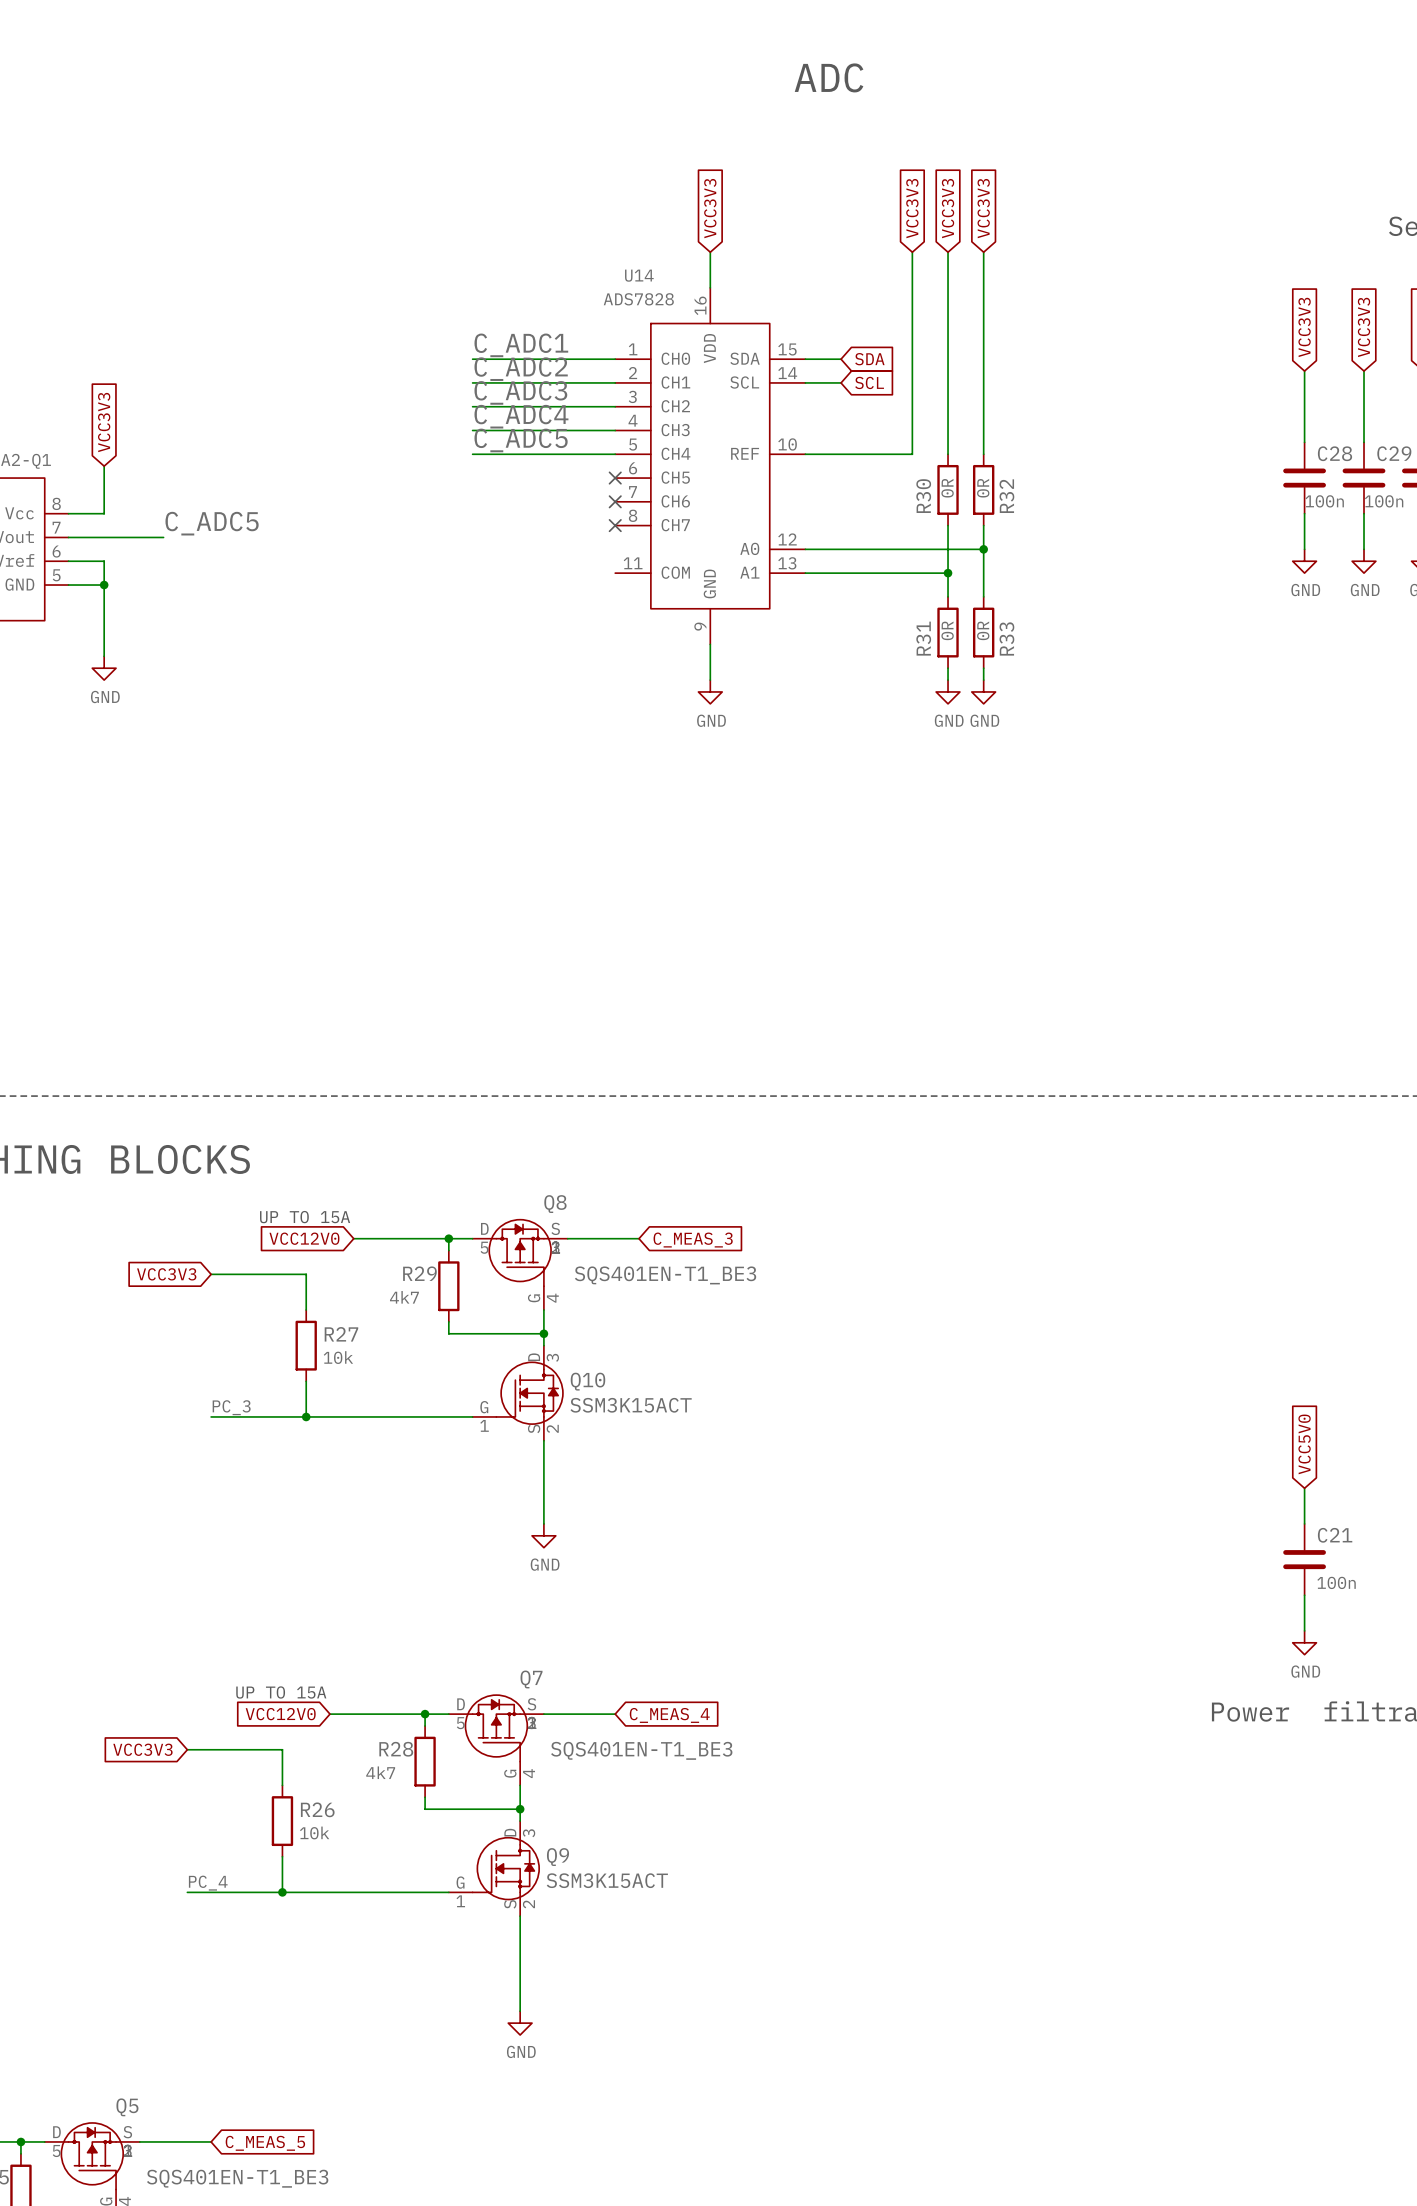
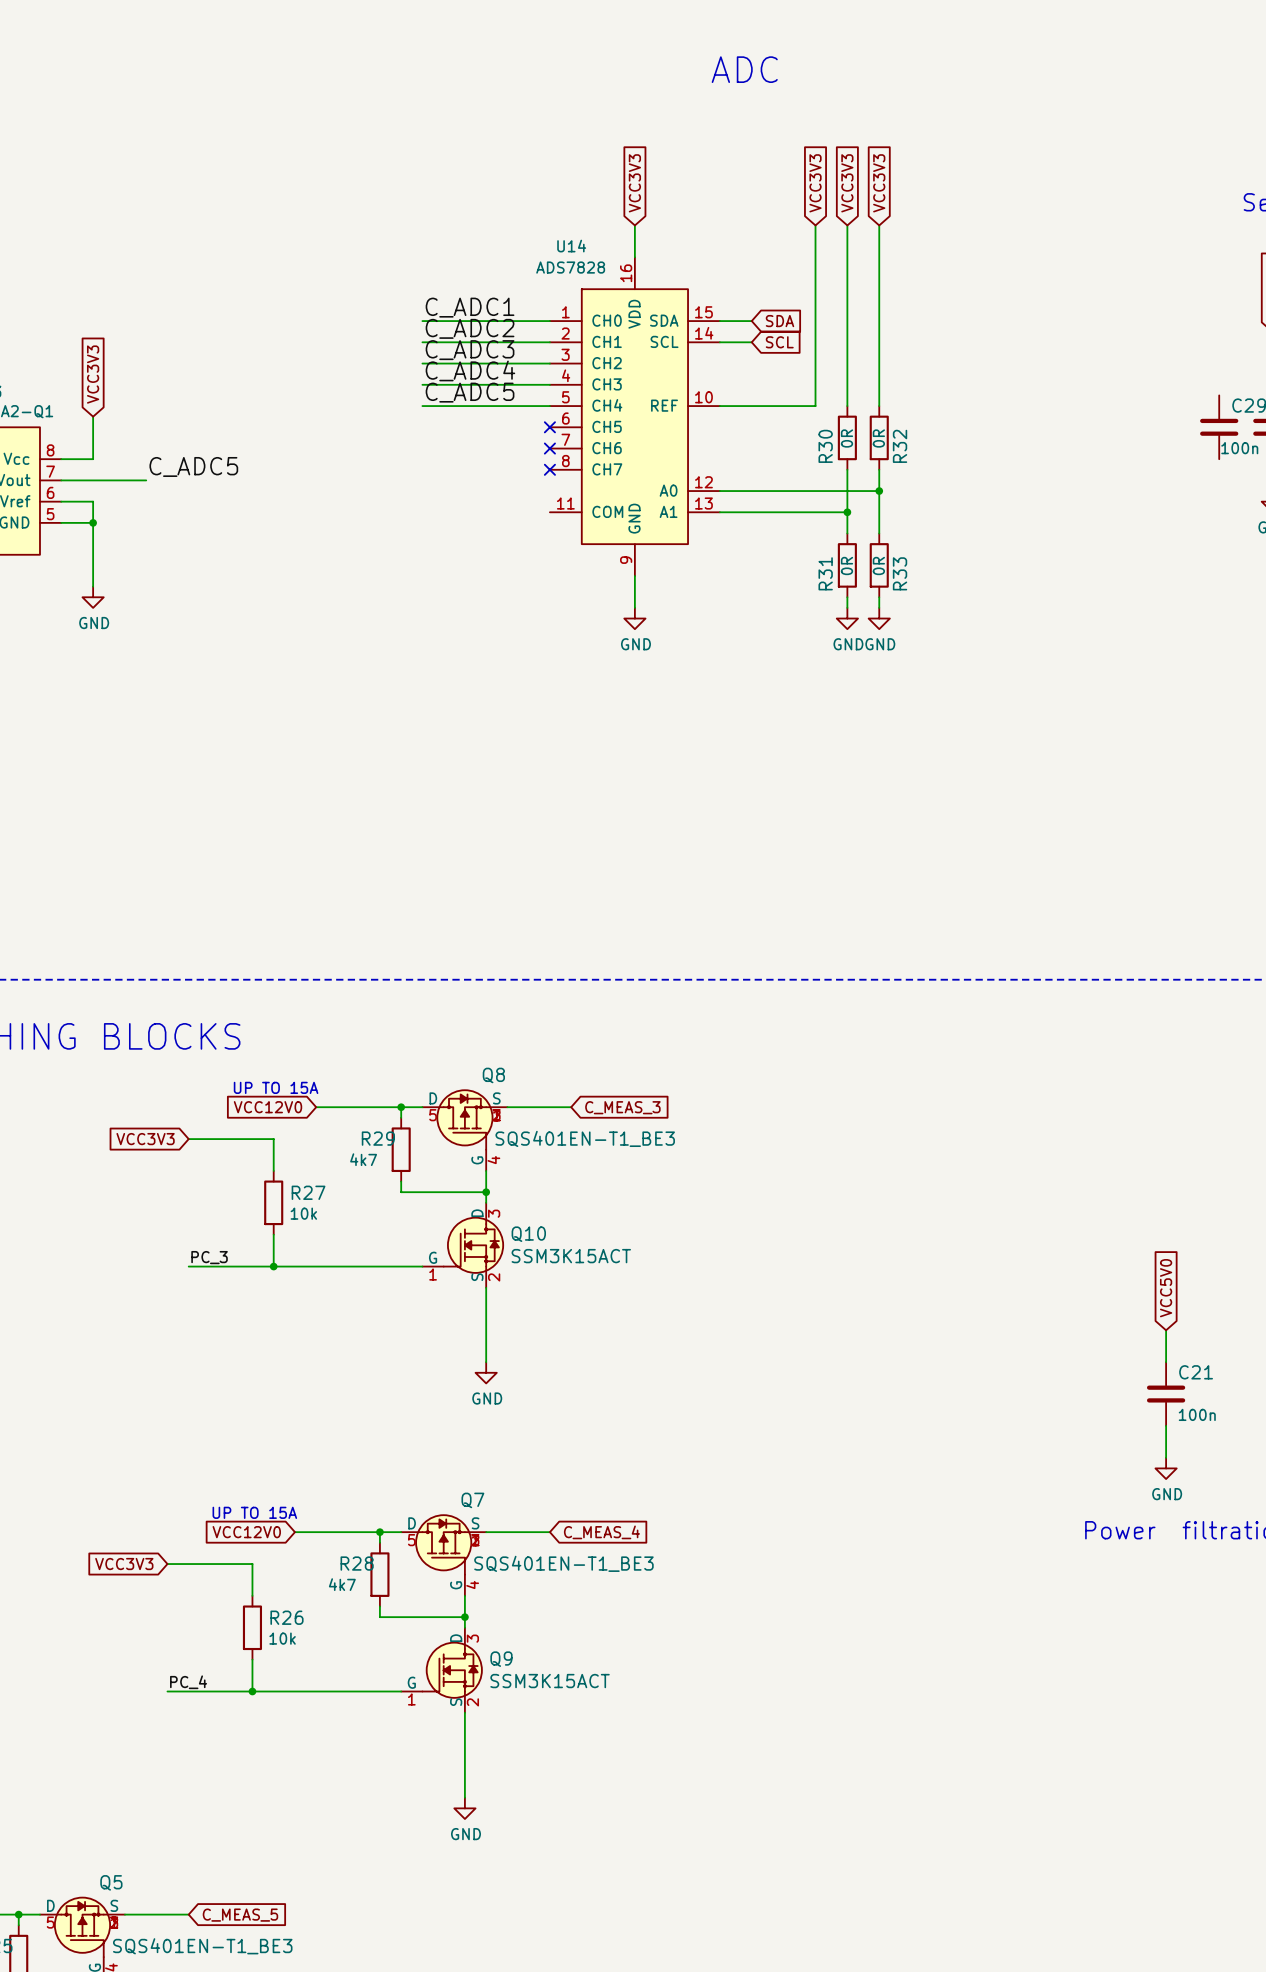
global label: VCC3V3 (1304, 327) -> none
global label: VCC3V3 (1364, 327) -> none
wire: (1304, 371) (1304, 442) -> none
wire: (1364, 371) (1364, 442) -> none
C28: (1304, 478) -> none
wire: (1304, 513) (1304, 549) -> none
wire: (1364, 513) (1364, 549) -> none
power symbol: GND (1304, 561) -> none
power symbol: GND (1364, 561) -> none

